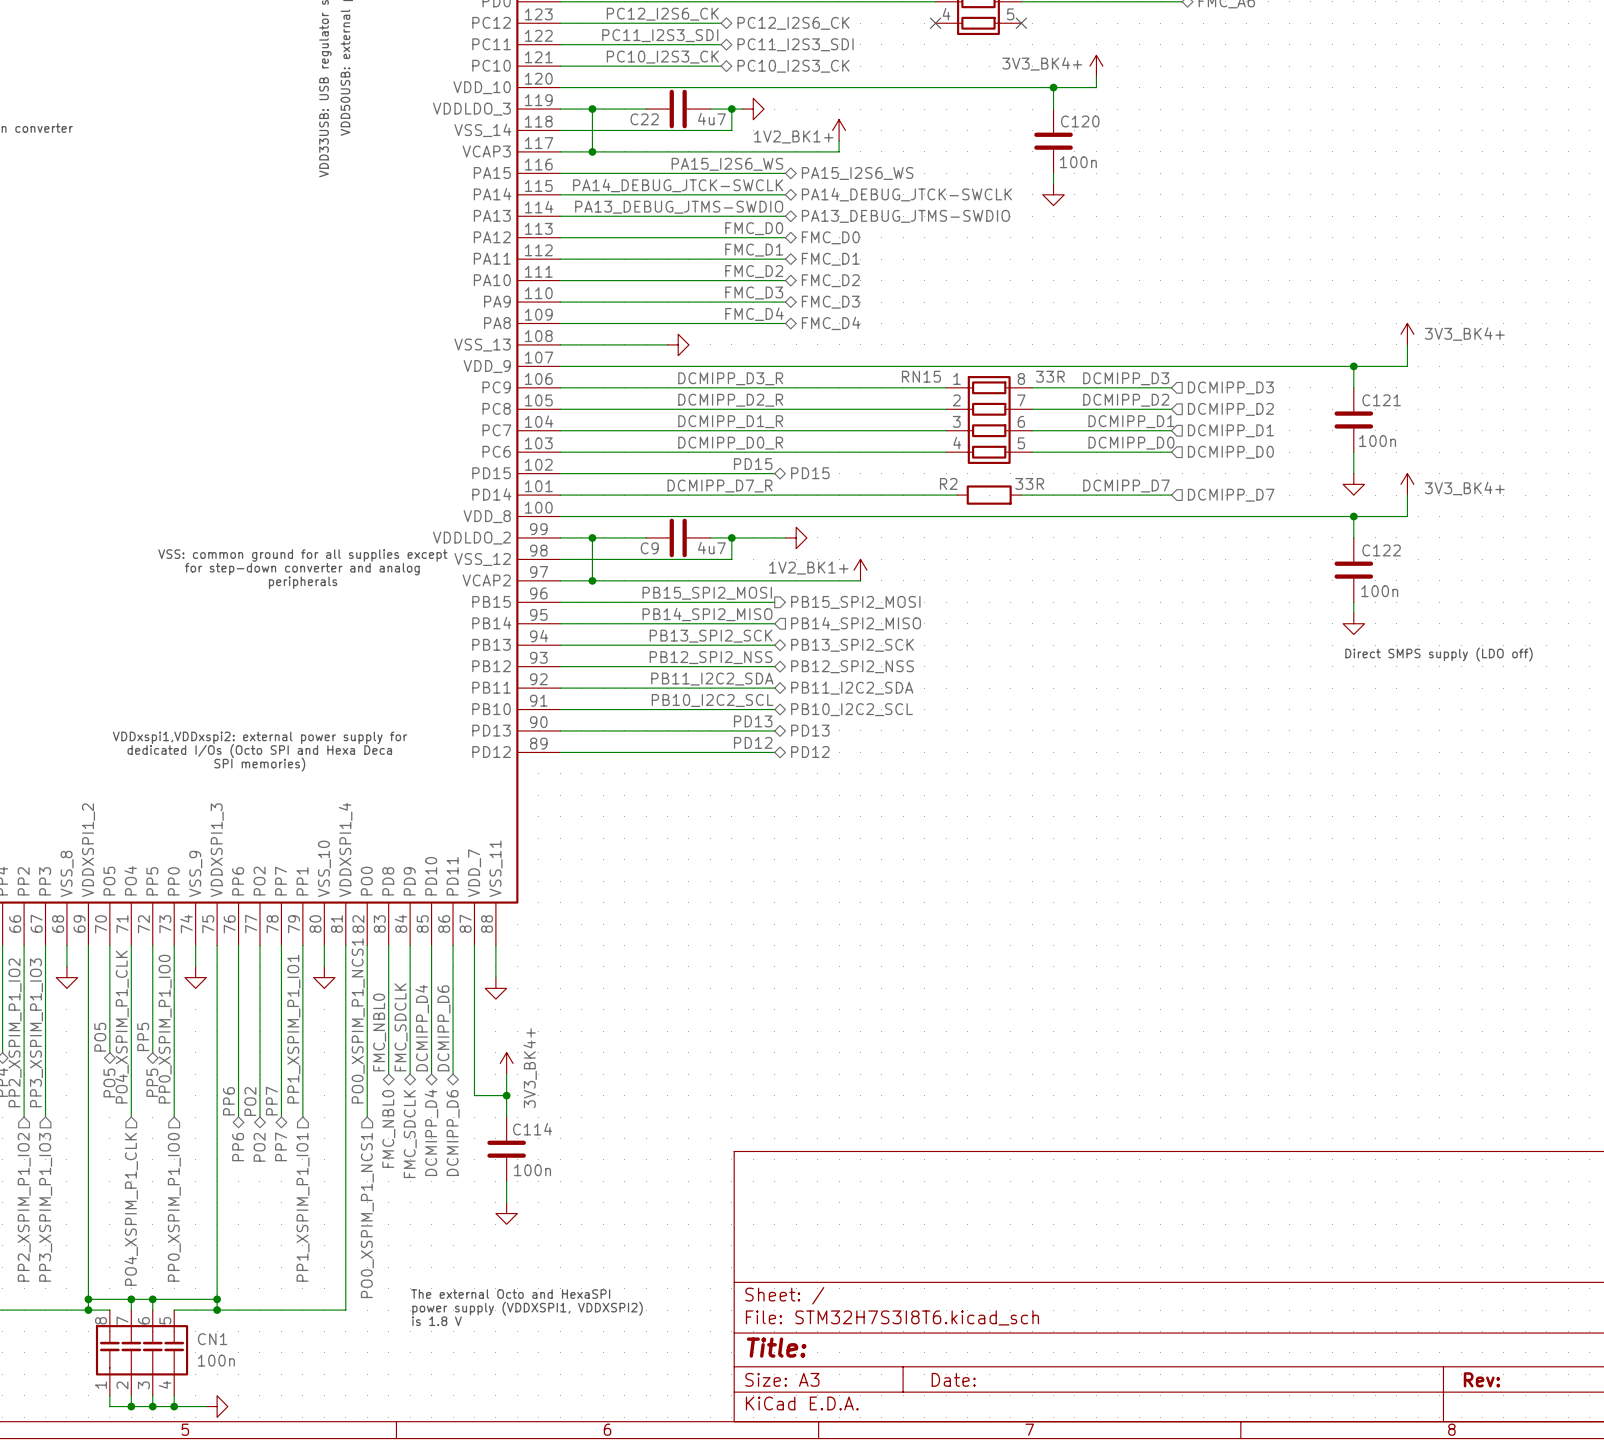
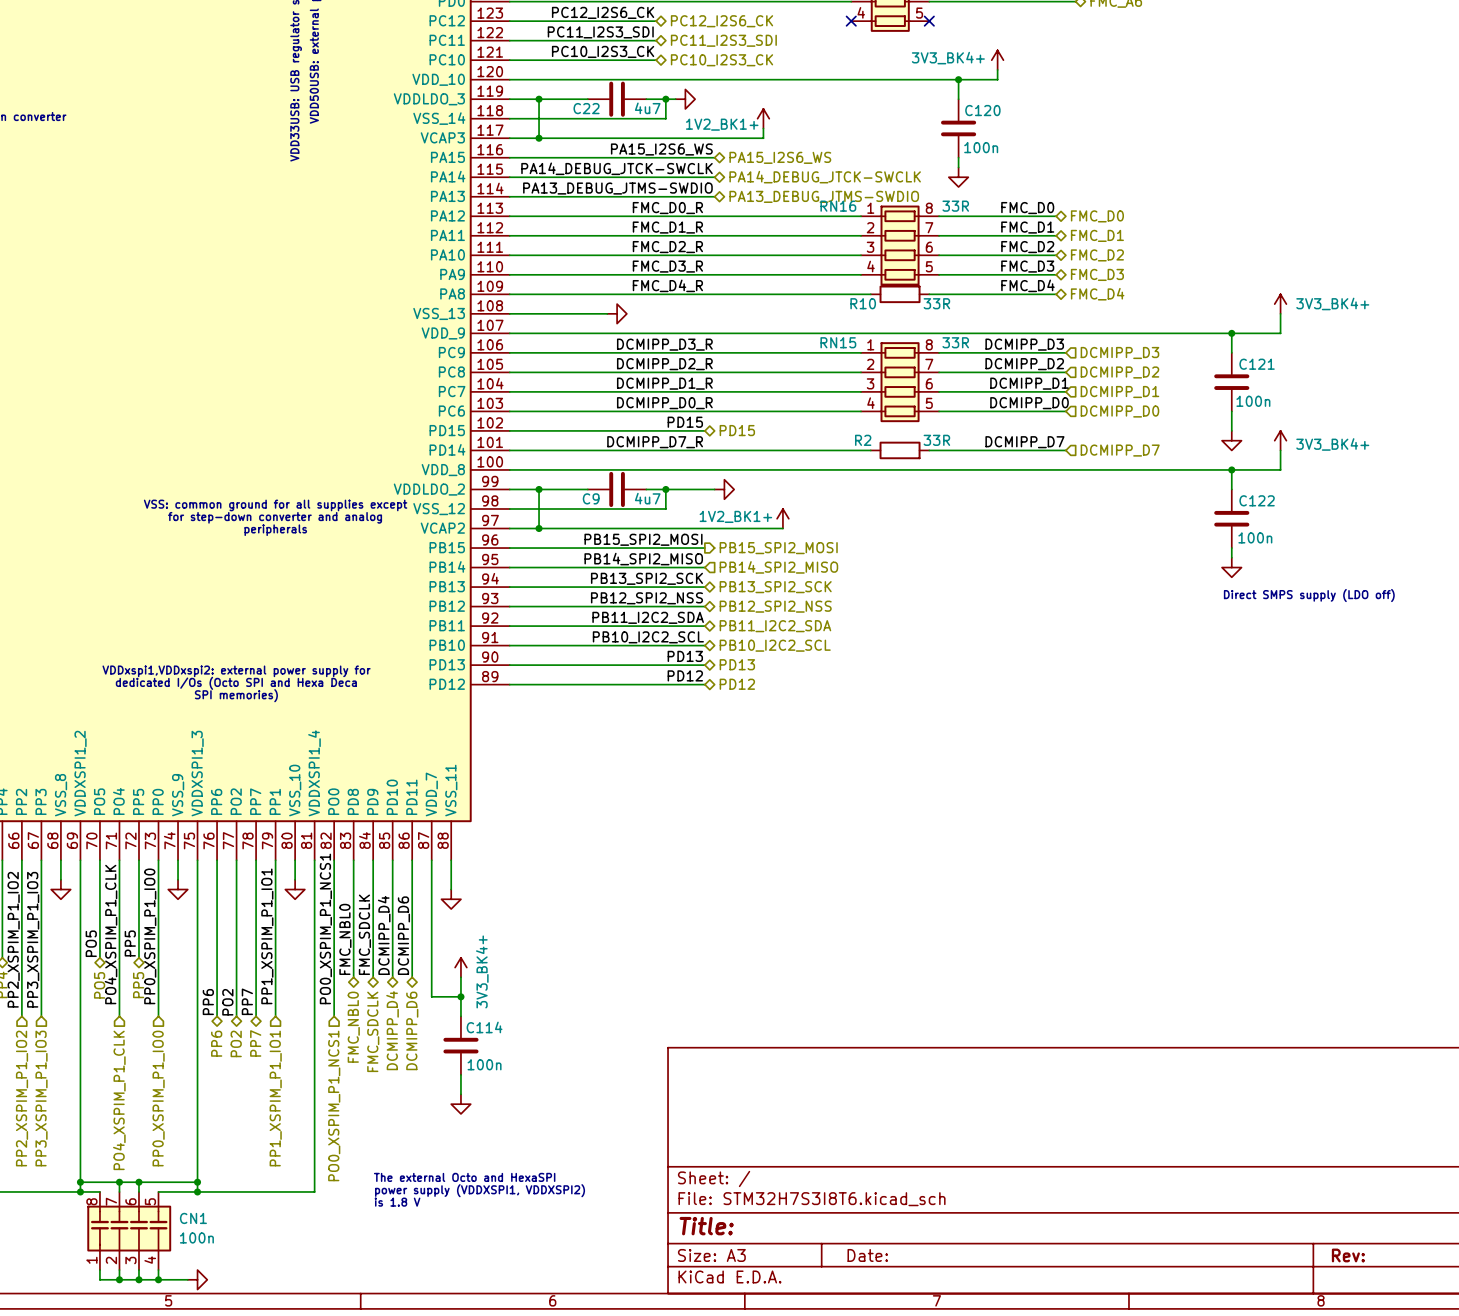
label: FMC_D0 (754, 228) -> FMC_D0_R (667, 208)
label: none -> FMC_D0 (1027, 208)
wire: none -> (714, 216) (861, 216)
hierarchical label: FMC_D0 (830, 237) -> none
wire: none -> (939, 216) (1056, 216)
hierarchical label: none -> FMC_D0 (1097, 216)
label: FMC_D1 (754, 250) -> FMC_D1_R (667, 227)
label: none -> FMC_D1 (1027, 227)
wire: none -> (714, 235) (861, 235)
hierarchical label: FMC_D1 (830, 259) -> none
wire: none -> (939, 235) (1056, 235)
hierarchical label: none -> FMC_D1 (1097, 235)
RN16: none -> 33R (900, 245)
label: FMC_D2 (754, 271) -> FMC_D2_R (667, 247)
label: none -> FMC_D2 (1027, 247)
wire: none -> (714, 255) (861, 255)
hierarchical label: FMC_D2 (830, 280) -> none
wire: none -> (939, 255) (1056, 255)
hierarchical label: none -> FMC_D2 (1097, 255)
label: FMC_D3 (754, 292) -> FMC_D3_R (667, 266)
label: none -> FMC_D3 (1027, 266)
wire: none -> (714, 274) (861, 274)
hierarchical label: FMC_D3 (830, 302) -> none
wire: none -> (939, 274) (1056, 274)
hierarchical label: none -> FMC_D3 (1097, 274)
label: FMC_D4 (754, 314) -> FMC_D4_R (667, 285)
label: none -> FMC_D4 (1027, 285)
wire: none -> (714, 294) (870, 294)
hierarchical label: FMC_D4 (831, 323) -> none
R10: none -> 33R (900, 294)
wire: none -> (929, 294) (1056, 294)
hierarchical label: none -> FMC_D4 (1097, 294)

